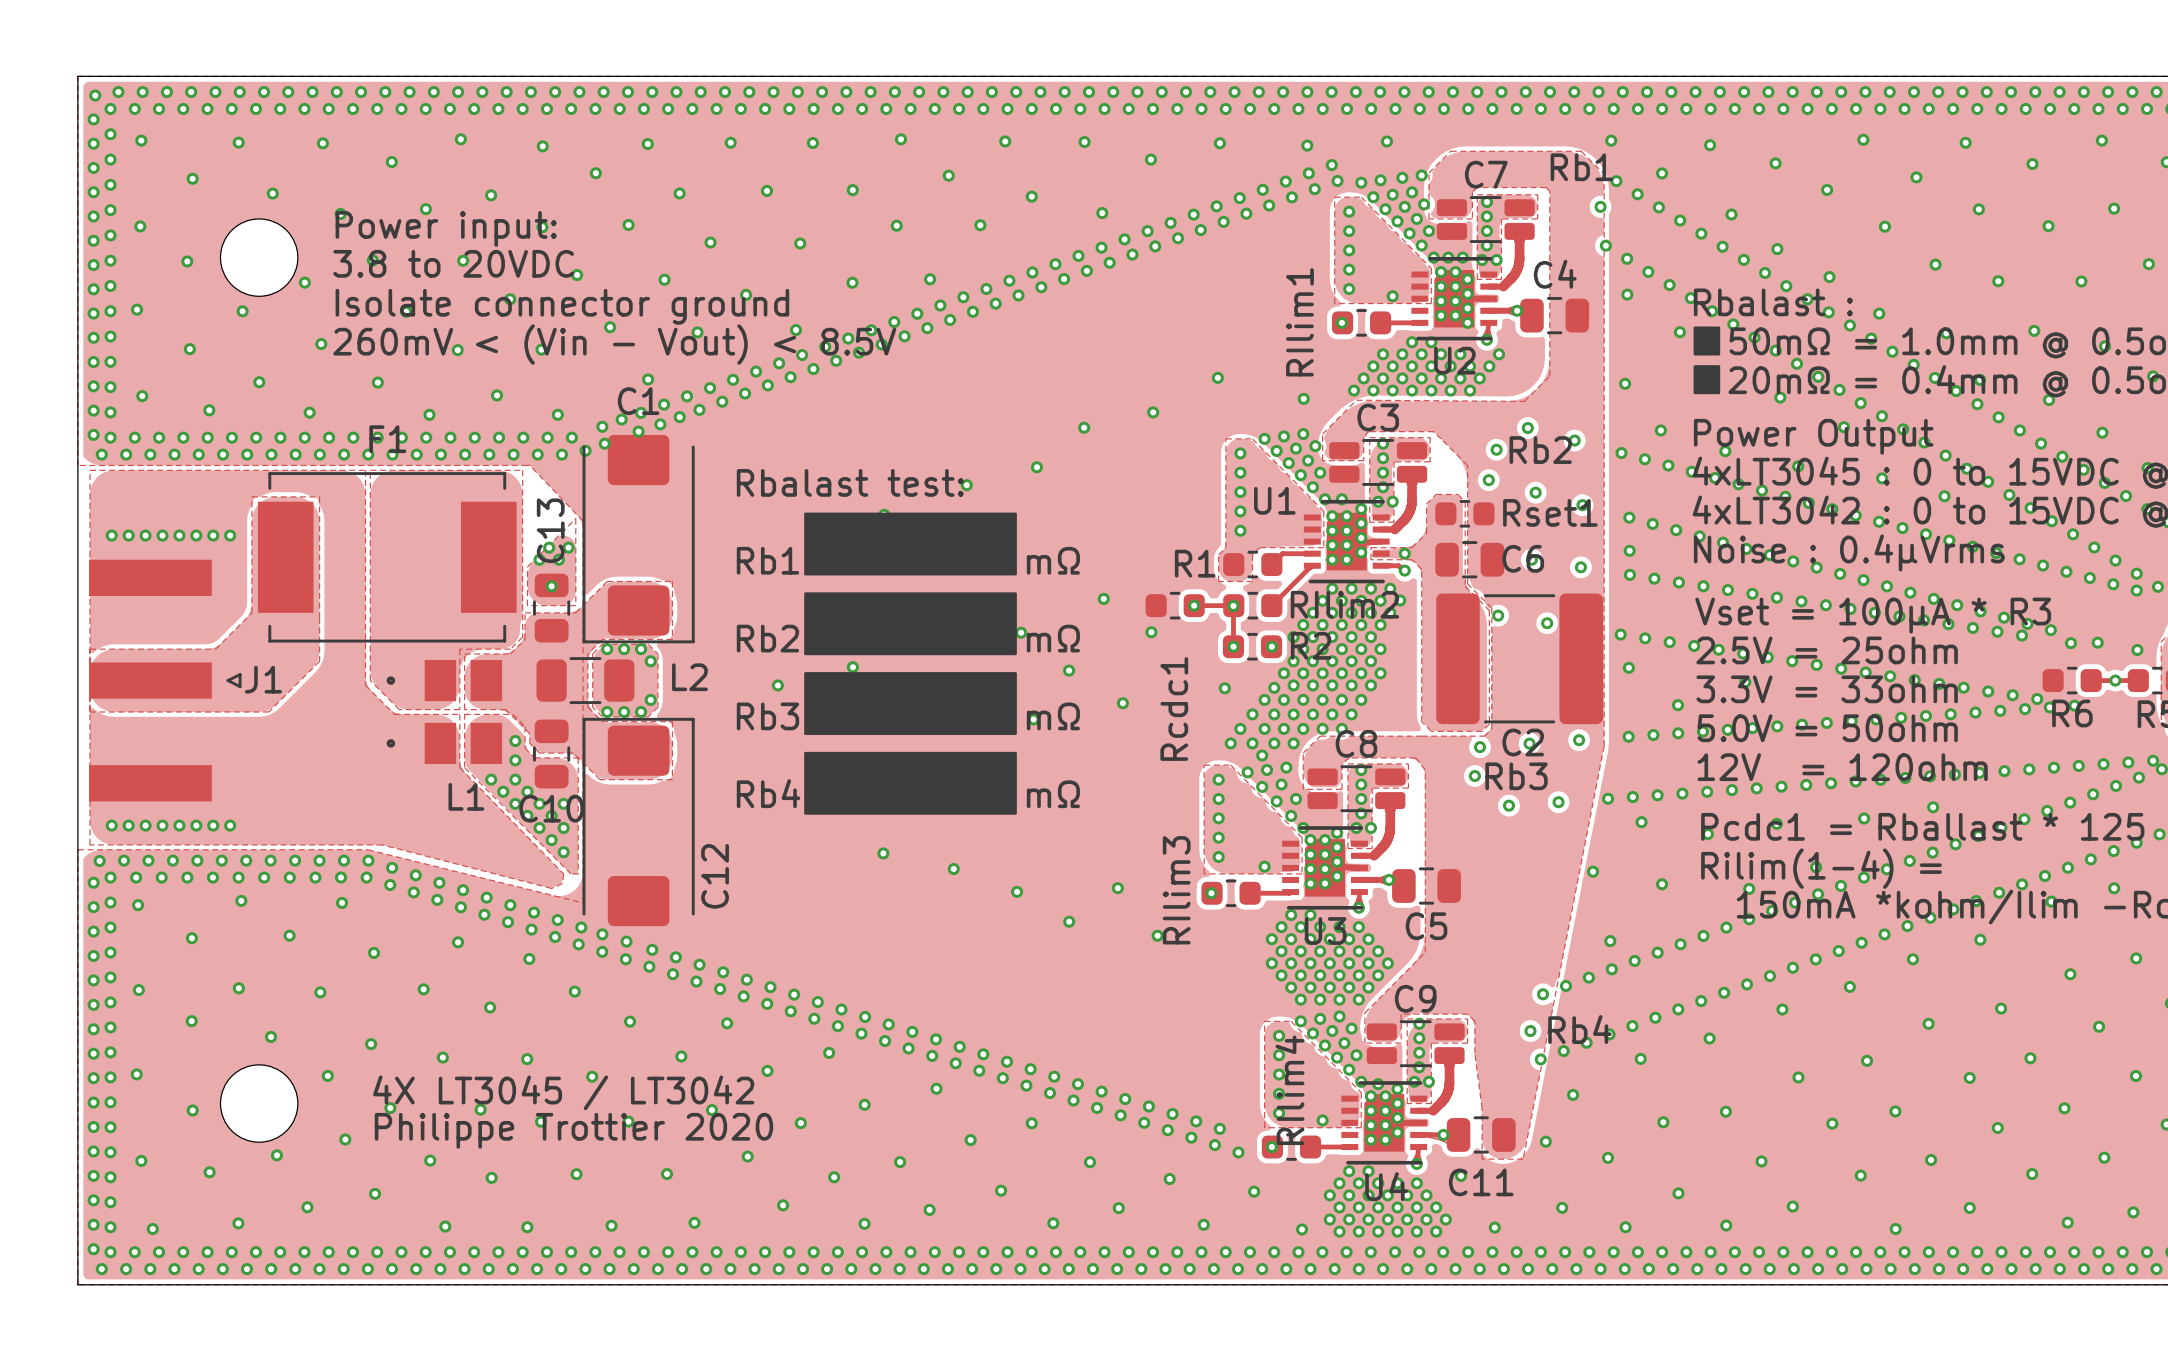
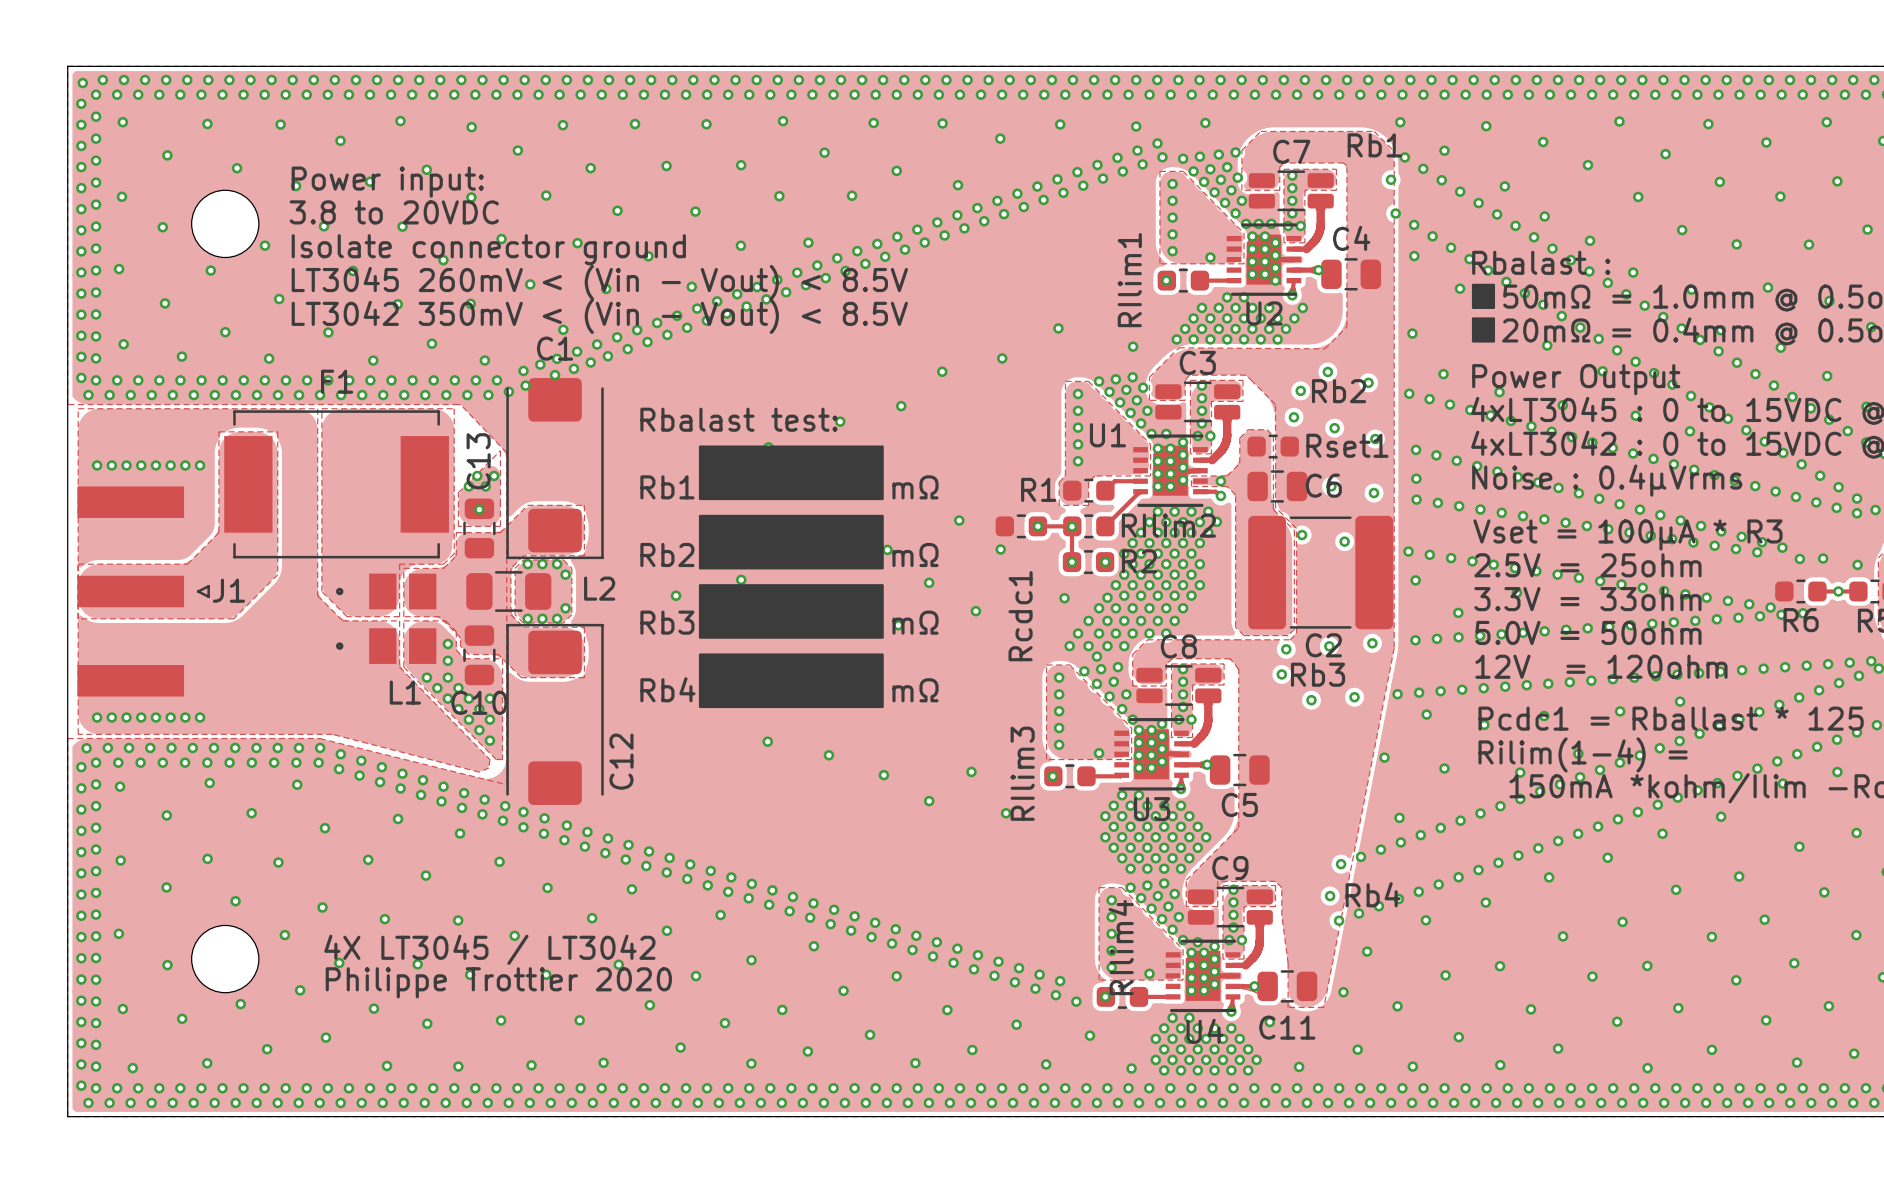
text position: Power input: (446, 228) -> Power input: (387, 182)
text position: 3.8 to 20VDC (453, 263) -> 3.8 to 20VDC (394, 212)
text position: Isolate connector ground (562, 306) -> Isolate connector ground (488, 249)
text: none -> LT3045 260mV < (Vin - Vout) < 8.5V (599, 282)
text: 260mV < (Vin - Vout) < 8.5V (614, 344) -> none
text: none -> LT3042 350mV < (Vin - Vout) < 8.5V (599, 316)

